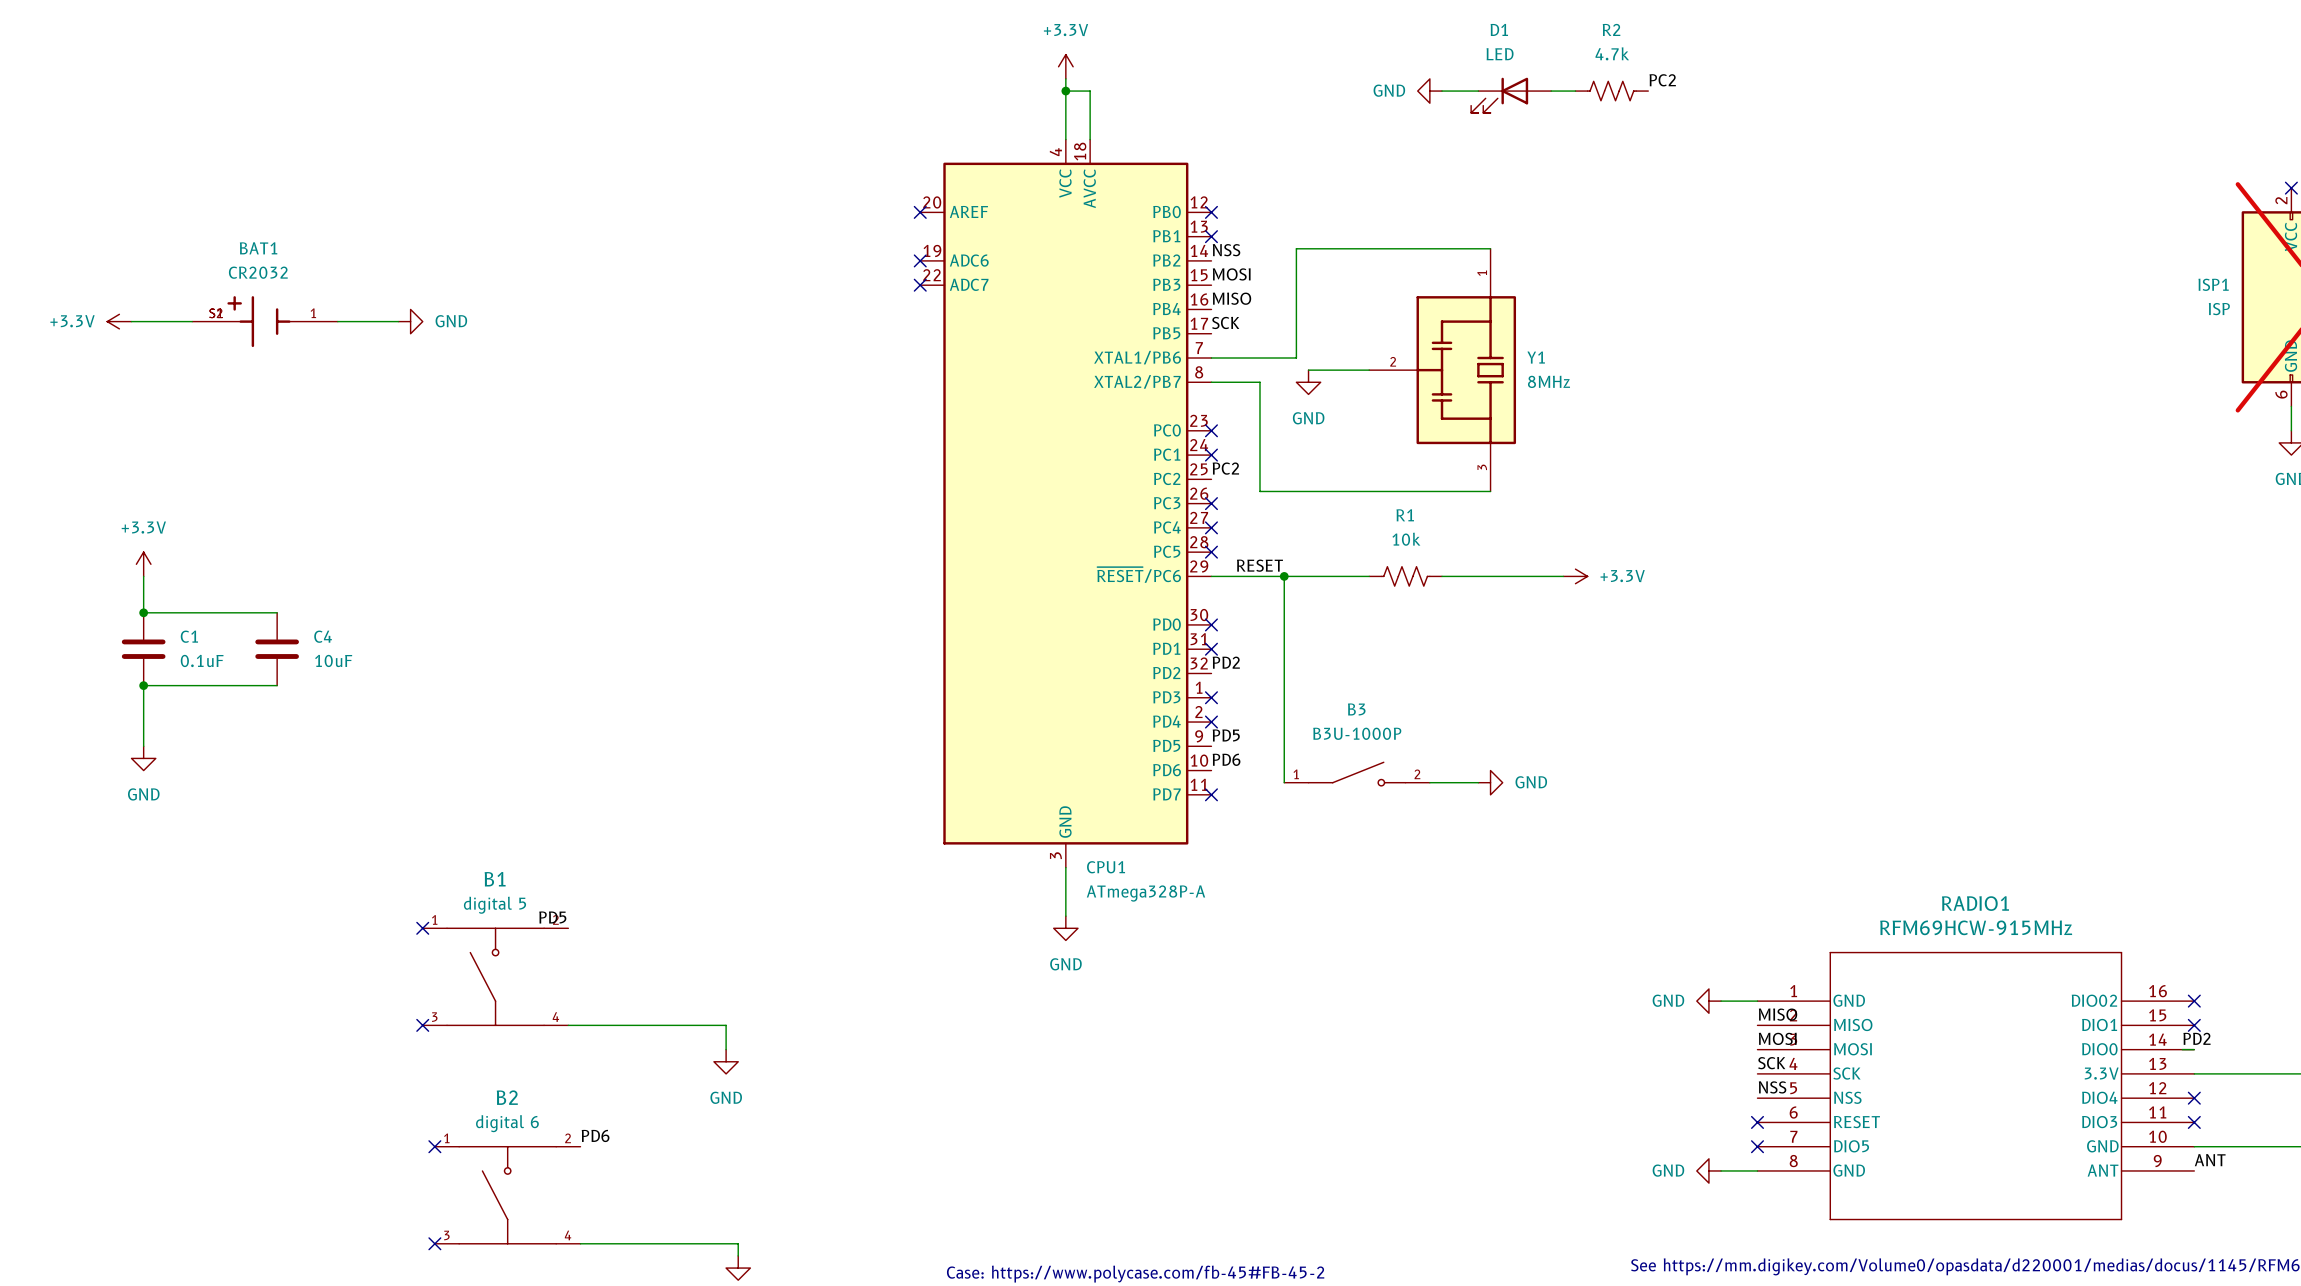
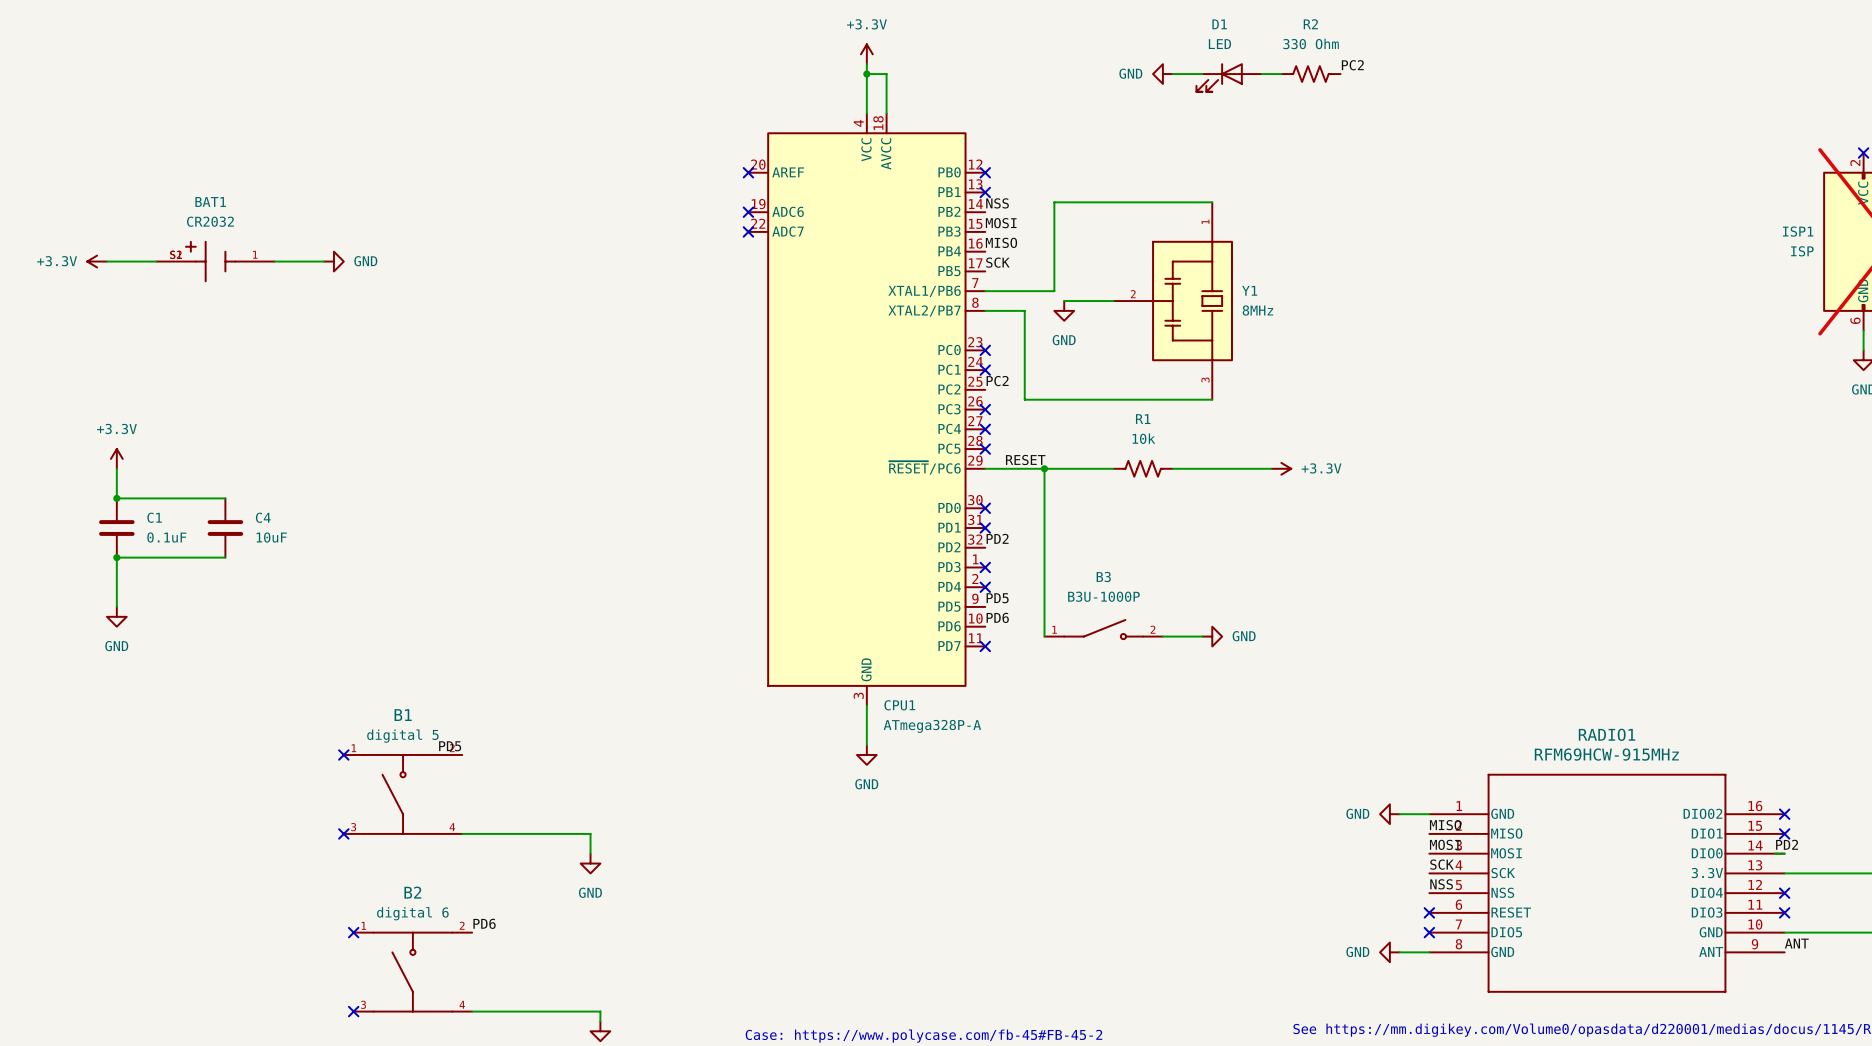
R2 value: 4.7k (1612, 53) -> 330 Ohm (1311, 43)

